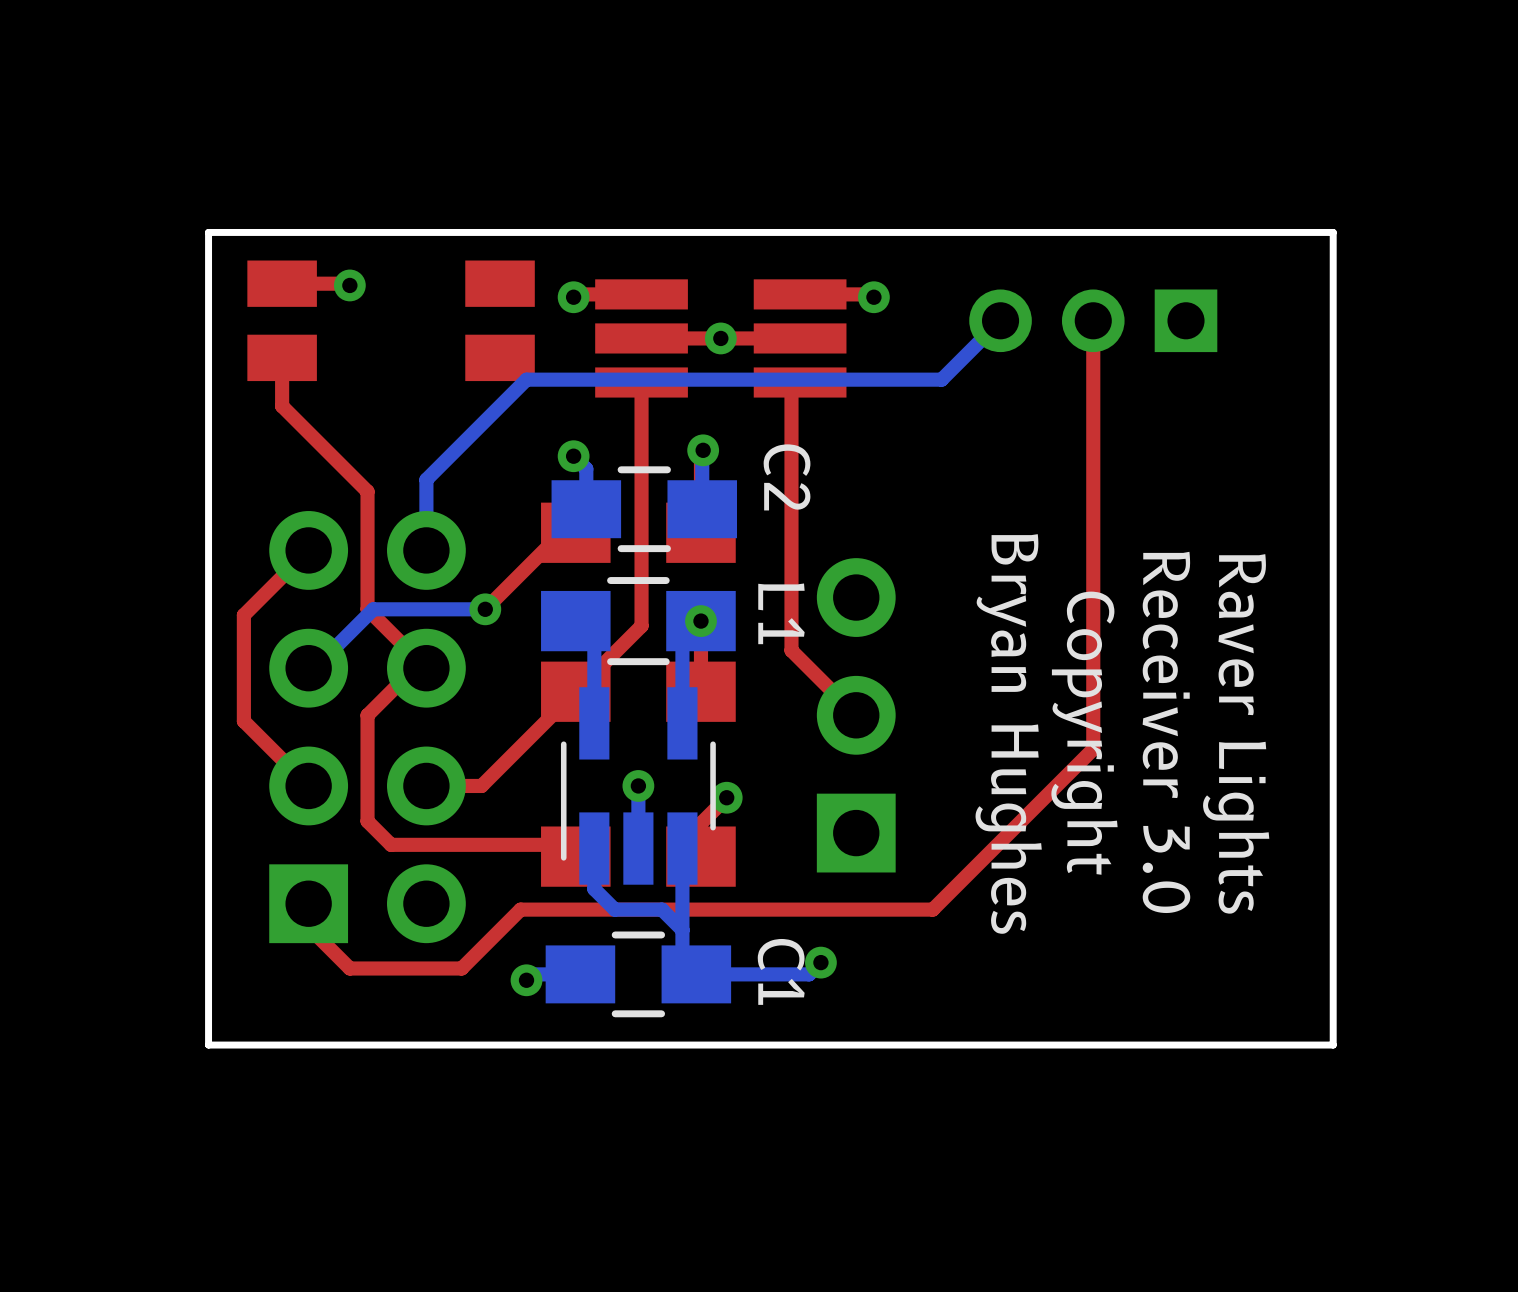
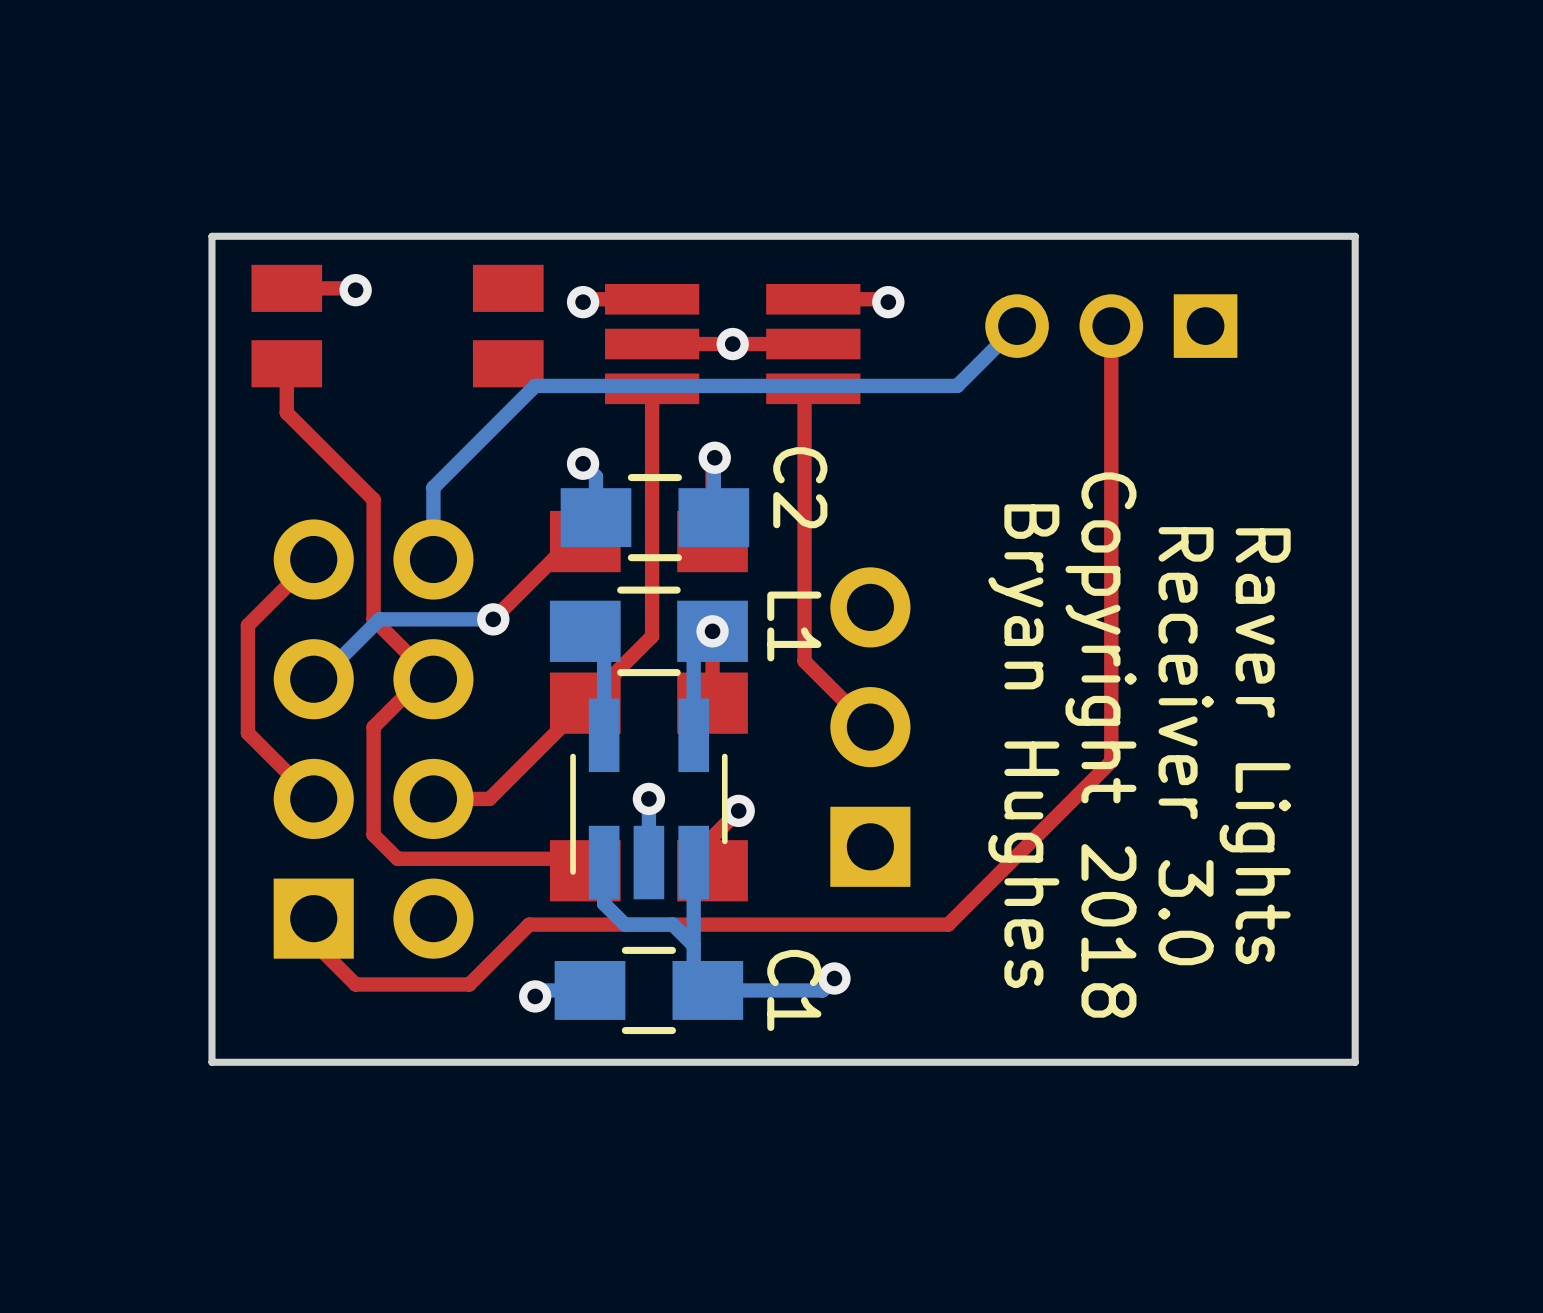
text: Copyright (1084, 733) -> Copyright 2018 (1100, 745)

